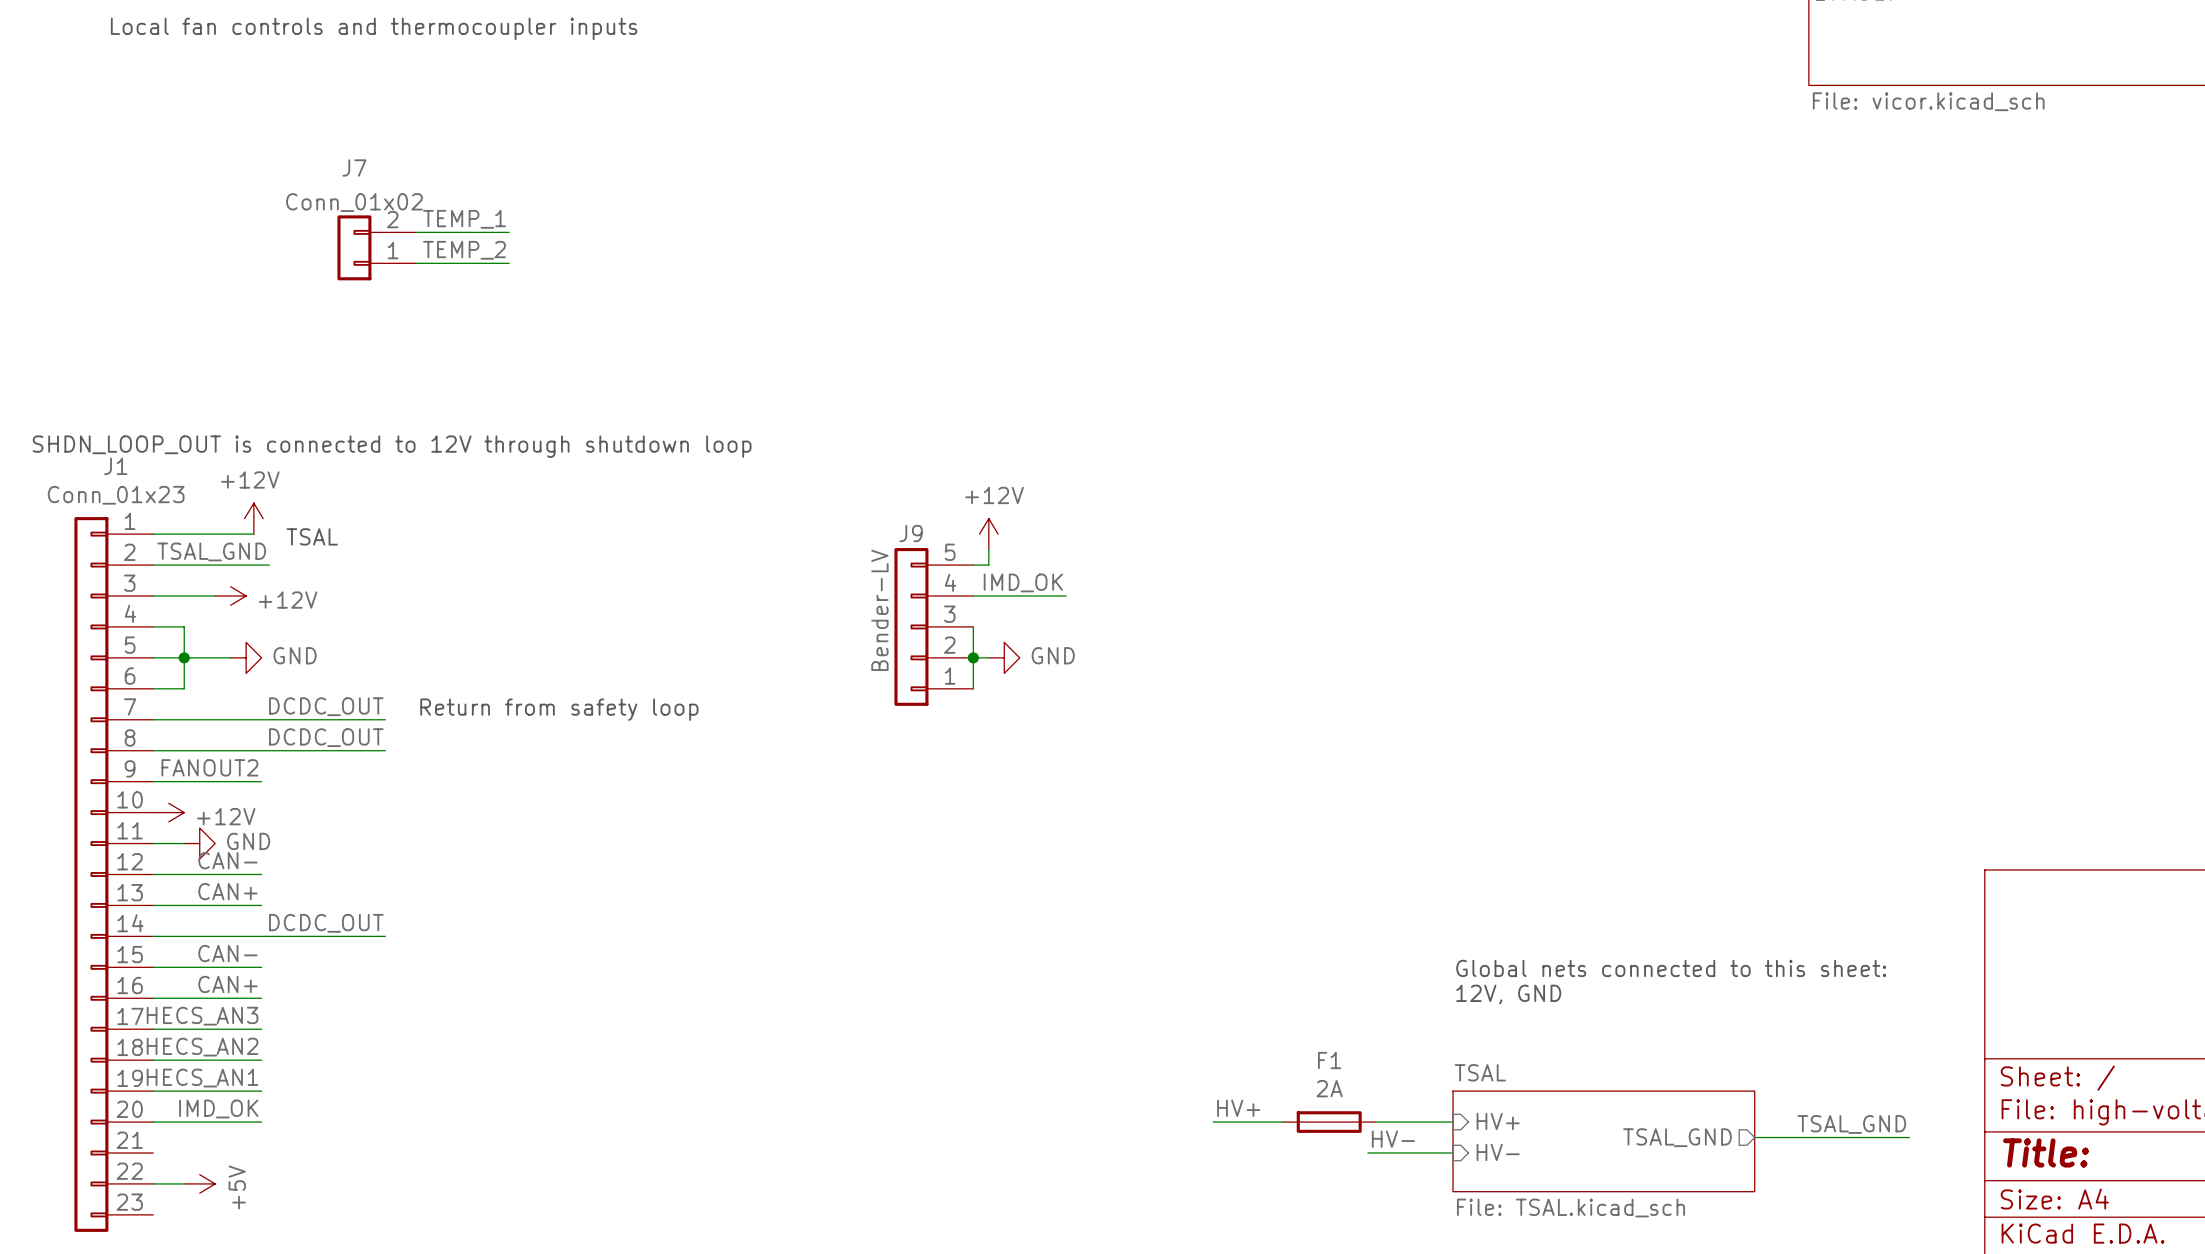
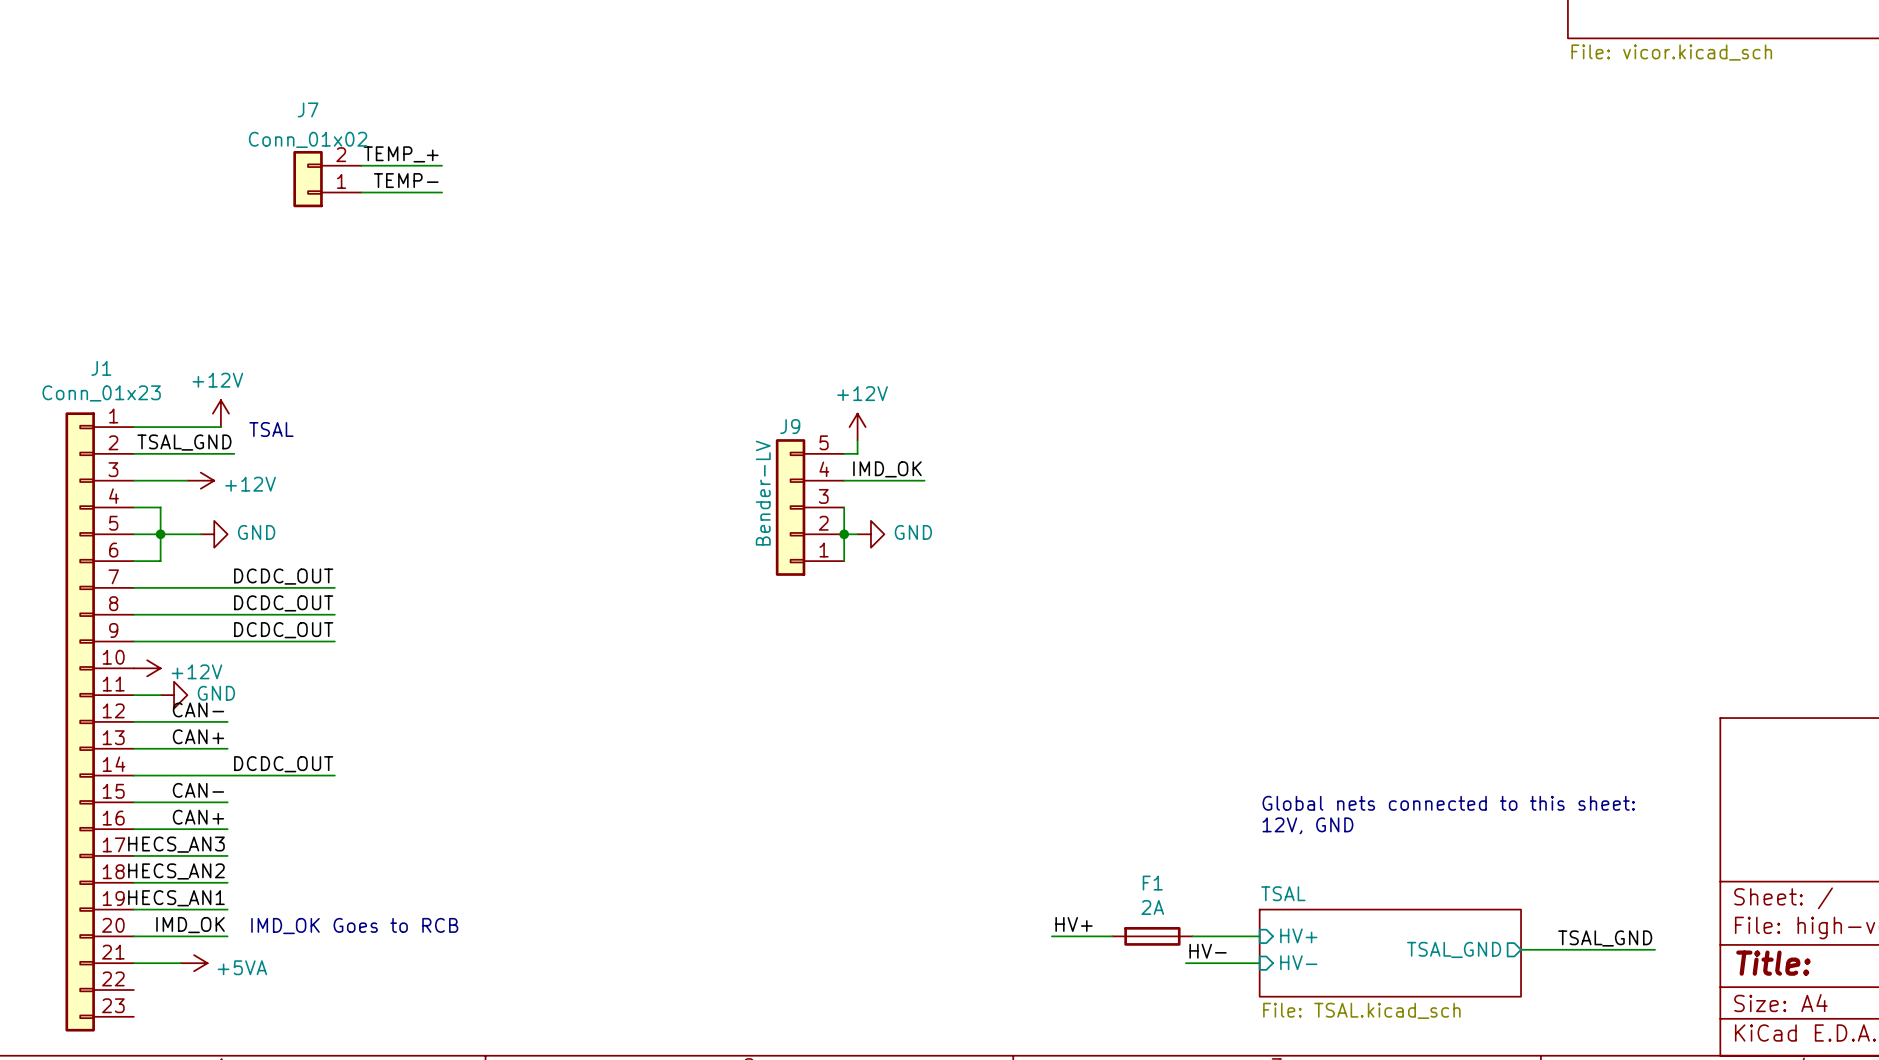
label: TEMP_1 (464, 219) -> TEMP_+ (401, 154)
label: TEMP_2 (464, 250) -> TEMP- (406, 180)
text: SHDN_LOOP_OUT is connected to 12V through shutdown loop (392, 446) -> none
text: Return from safety loop (559, 709) -> none
label: FANOUT2 (209, 767) -> none
label: none -> DCDC_OUT (283, 630)
wire: none -> (227, 641) (334, 641)
text: none -> IMD_OK Goes to RCB (354, 926)
wire: none -> (133, 963) (180, 963)
power symbol: none -> +5VA (194, 963)
wire: (153, 1183) (184, 1183) -> none
power symbol: +5V (199, 1183) -> none

